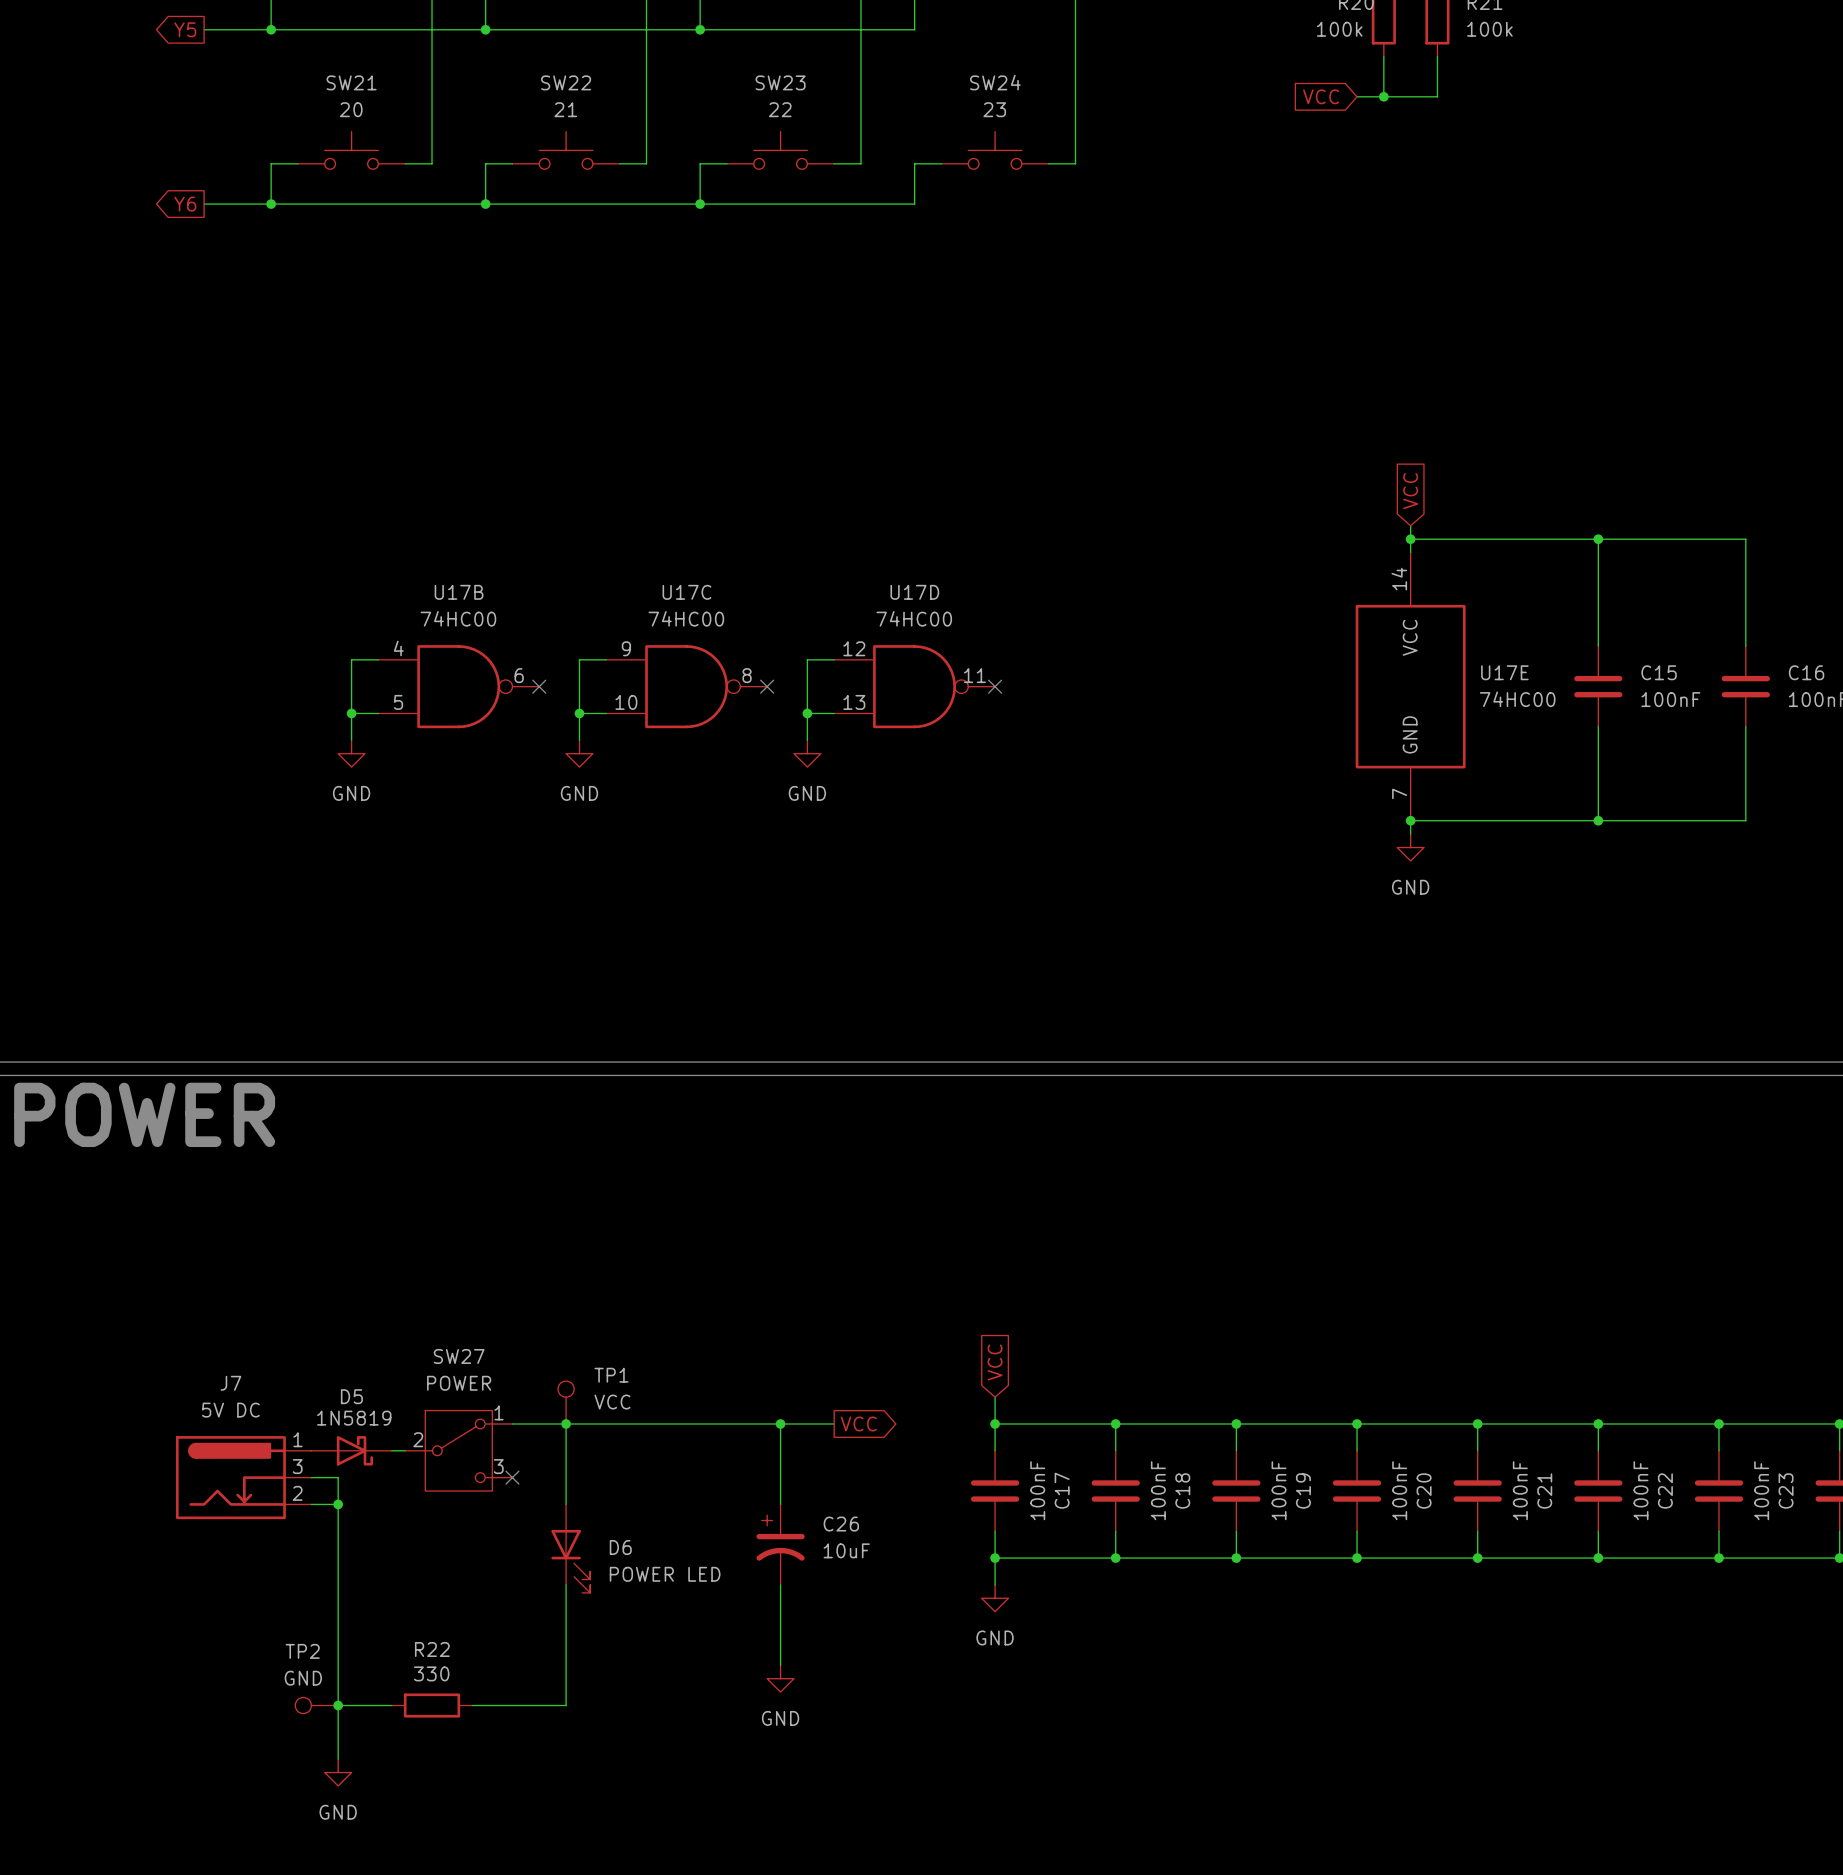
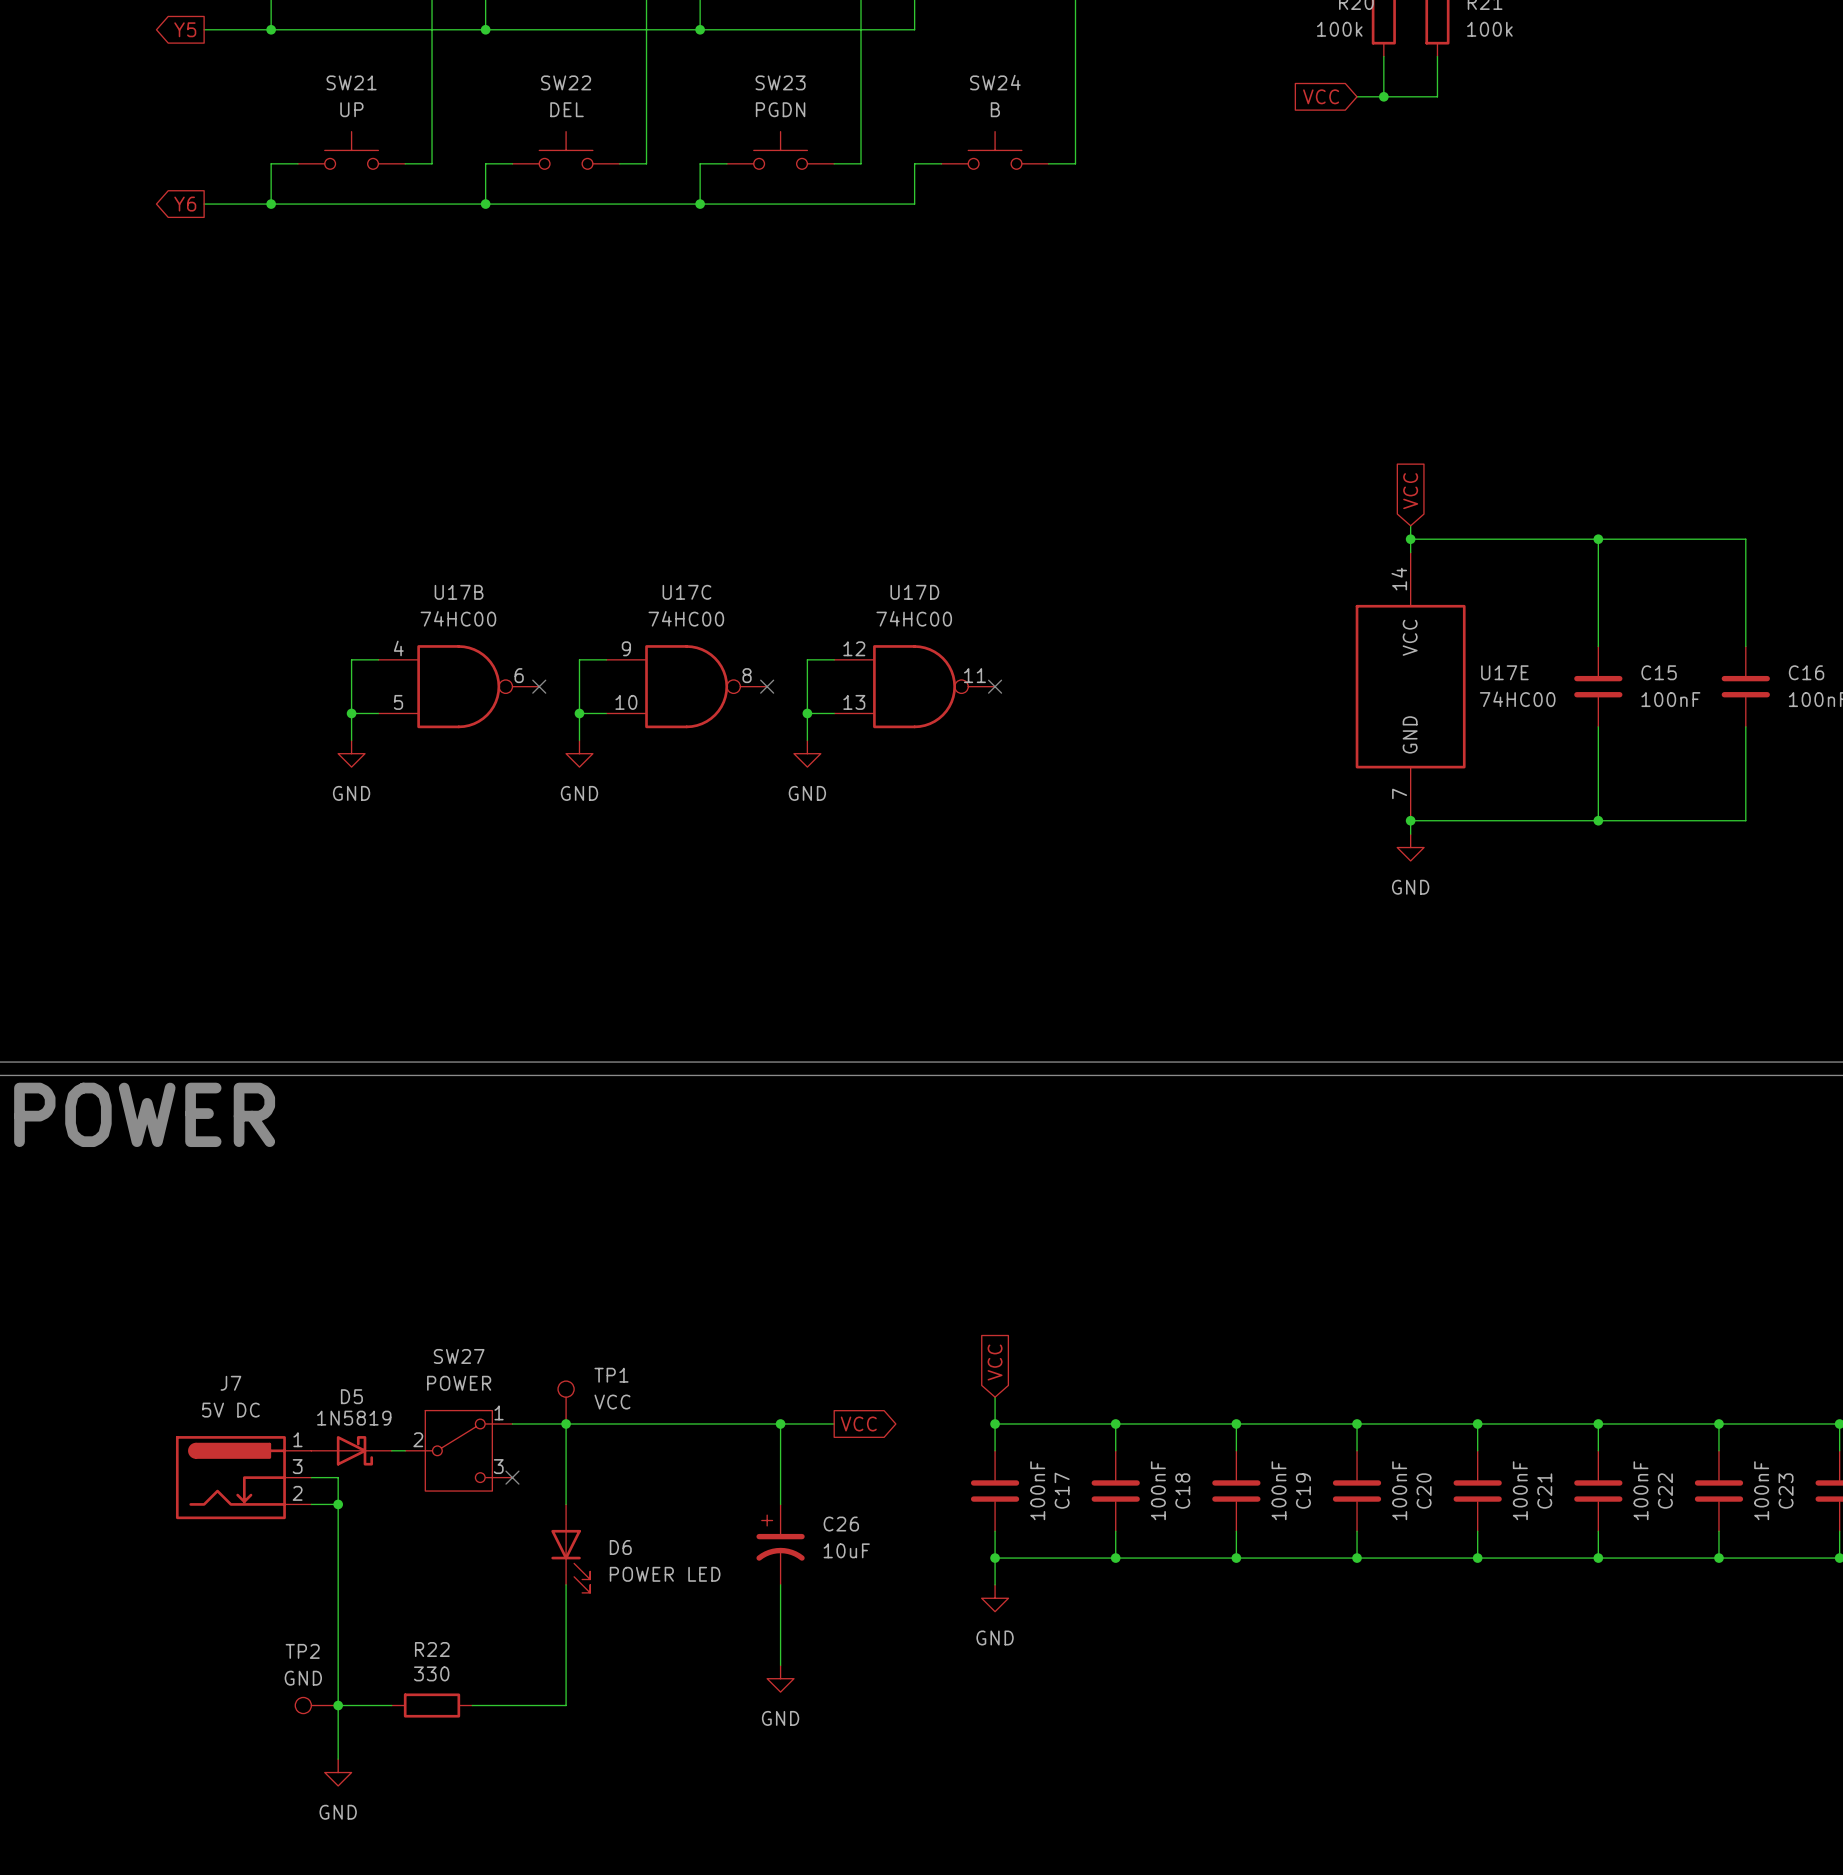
SW21 value: 20 (351, 109) -> UP (351, 109)
SW22 value: 21 (565, 109) -> DEL (567, 109)
SW23 value: 22 (780, 109) -> PGDN (780, 109)
SW24 value: 23 (994, 109) -> B (995, 109)

